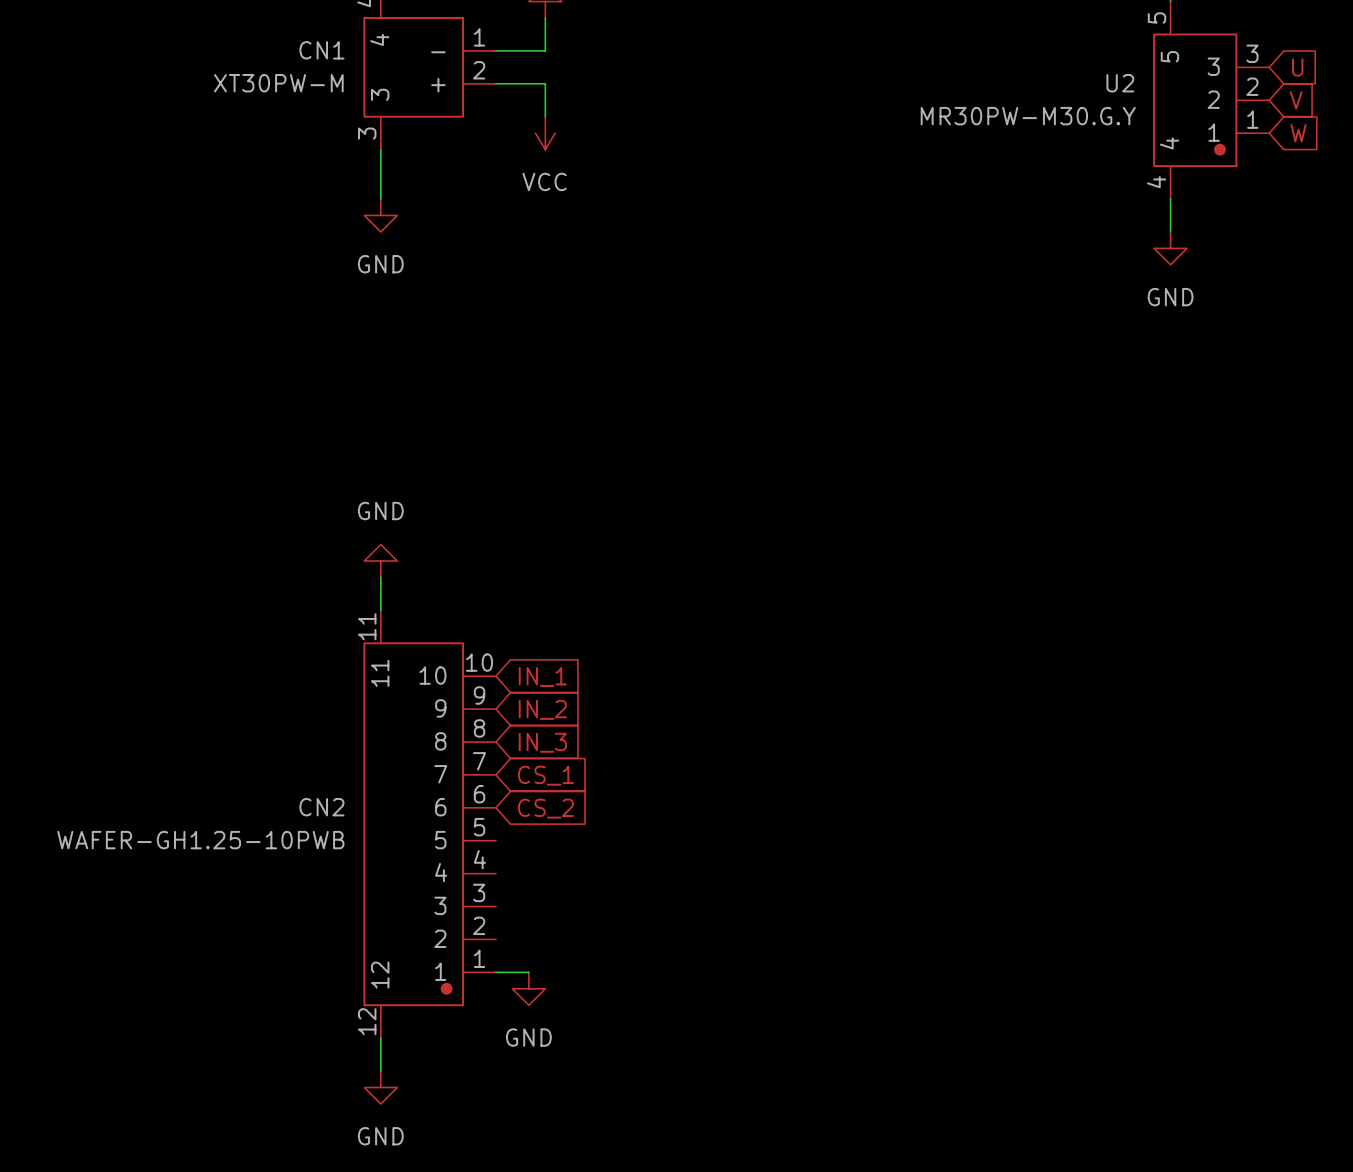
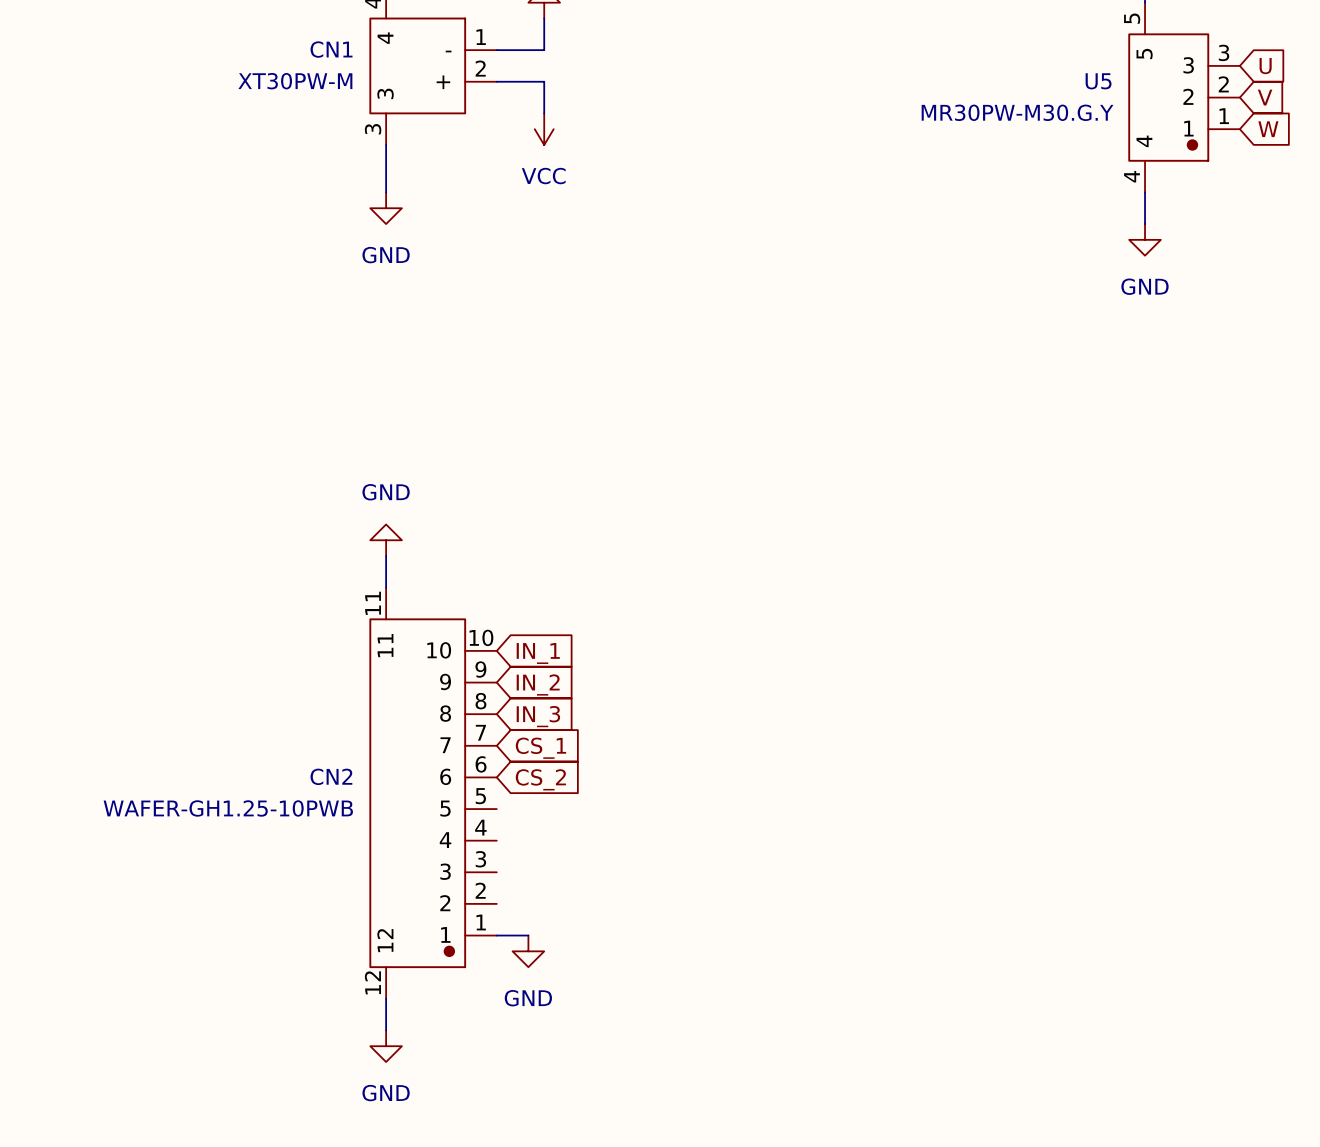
U2 name: U2 (1120, 83) -> U5 (1098, 81)

